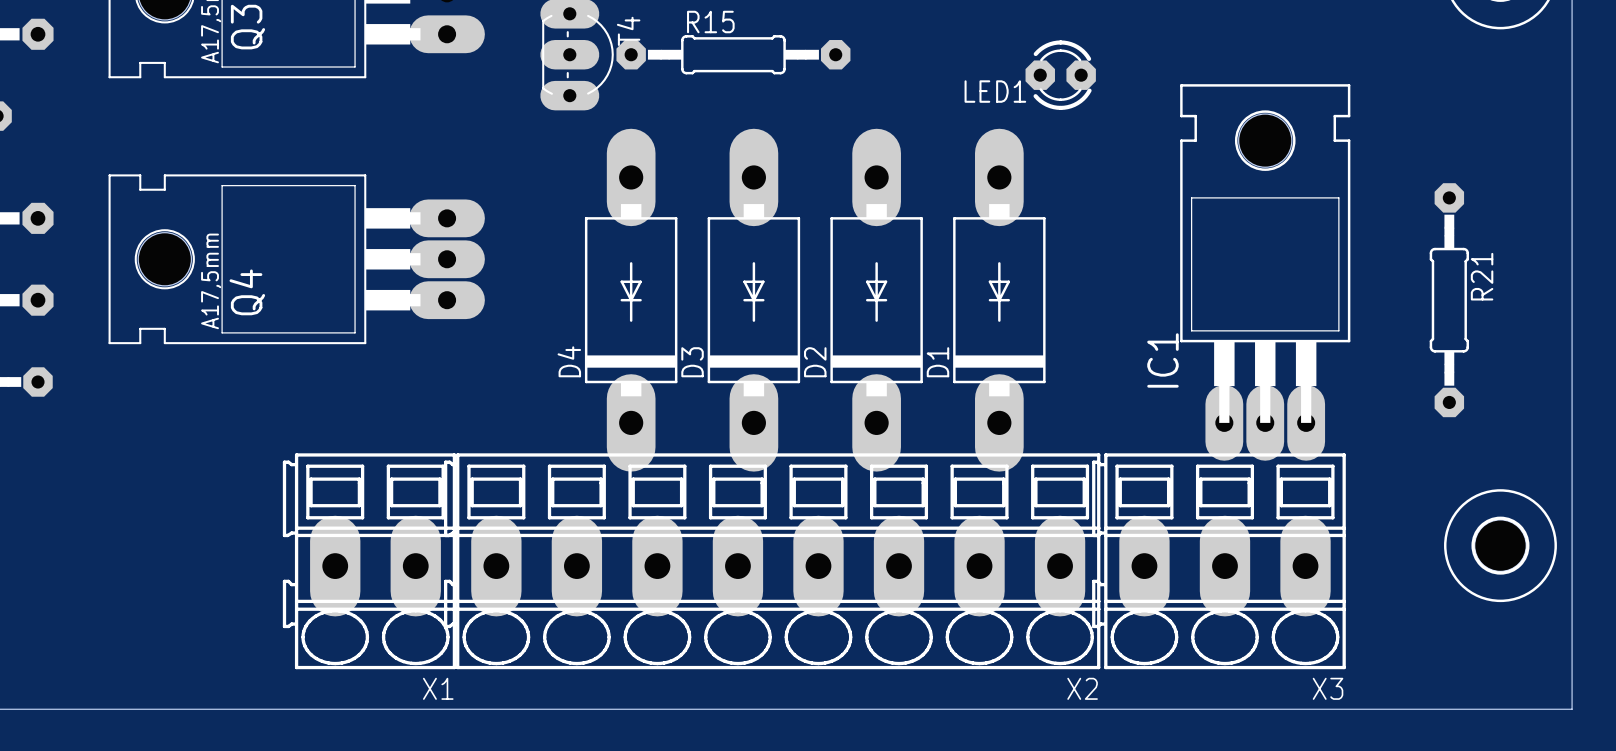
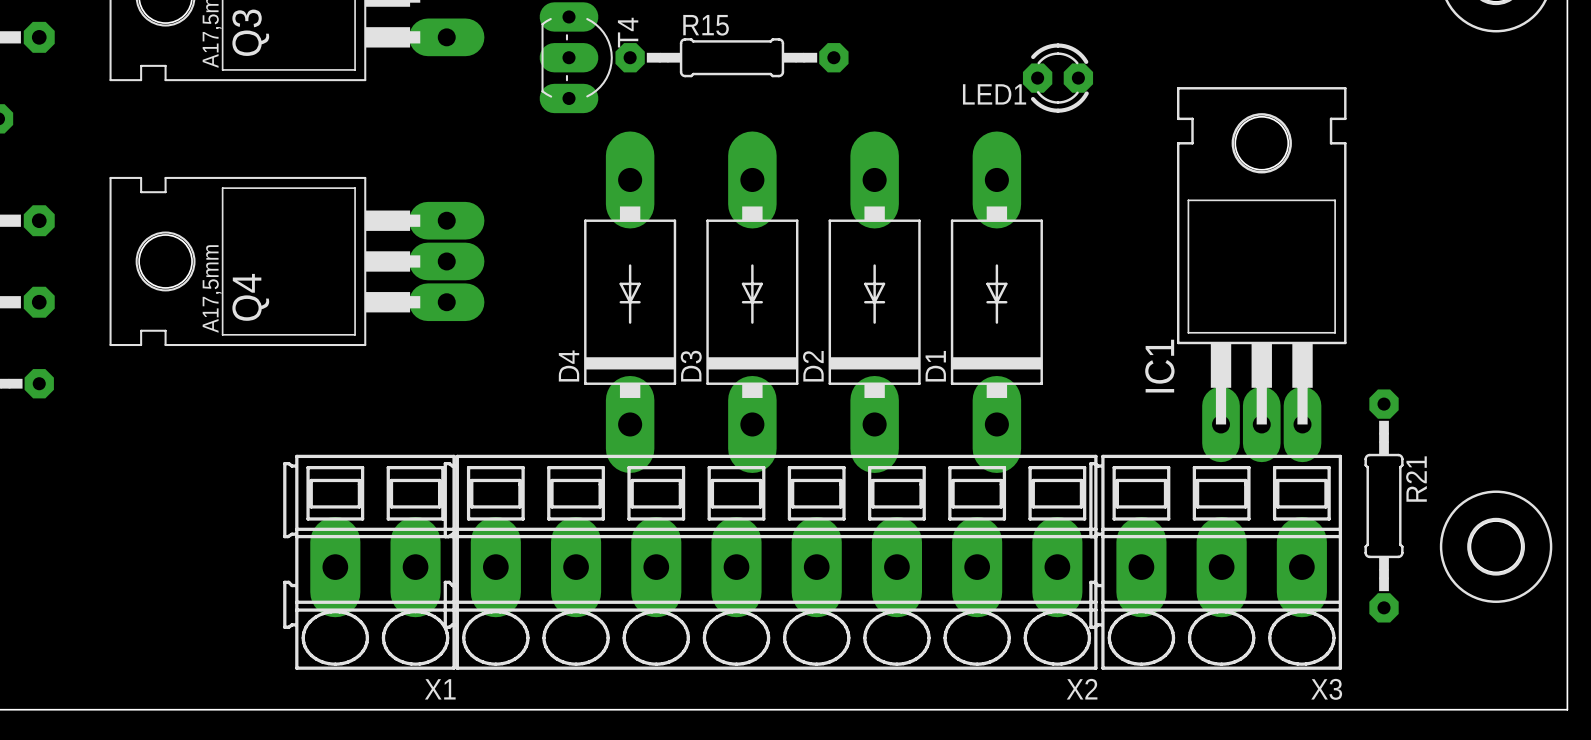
R21 position: (1449, 300) -> (1384, 505)

